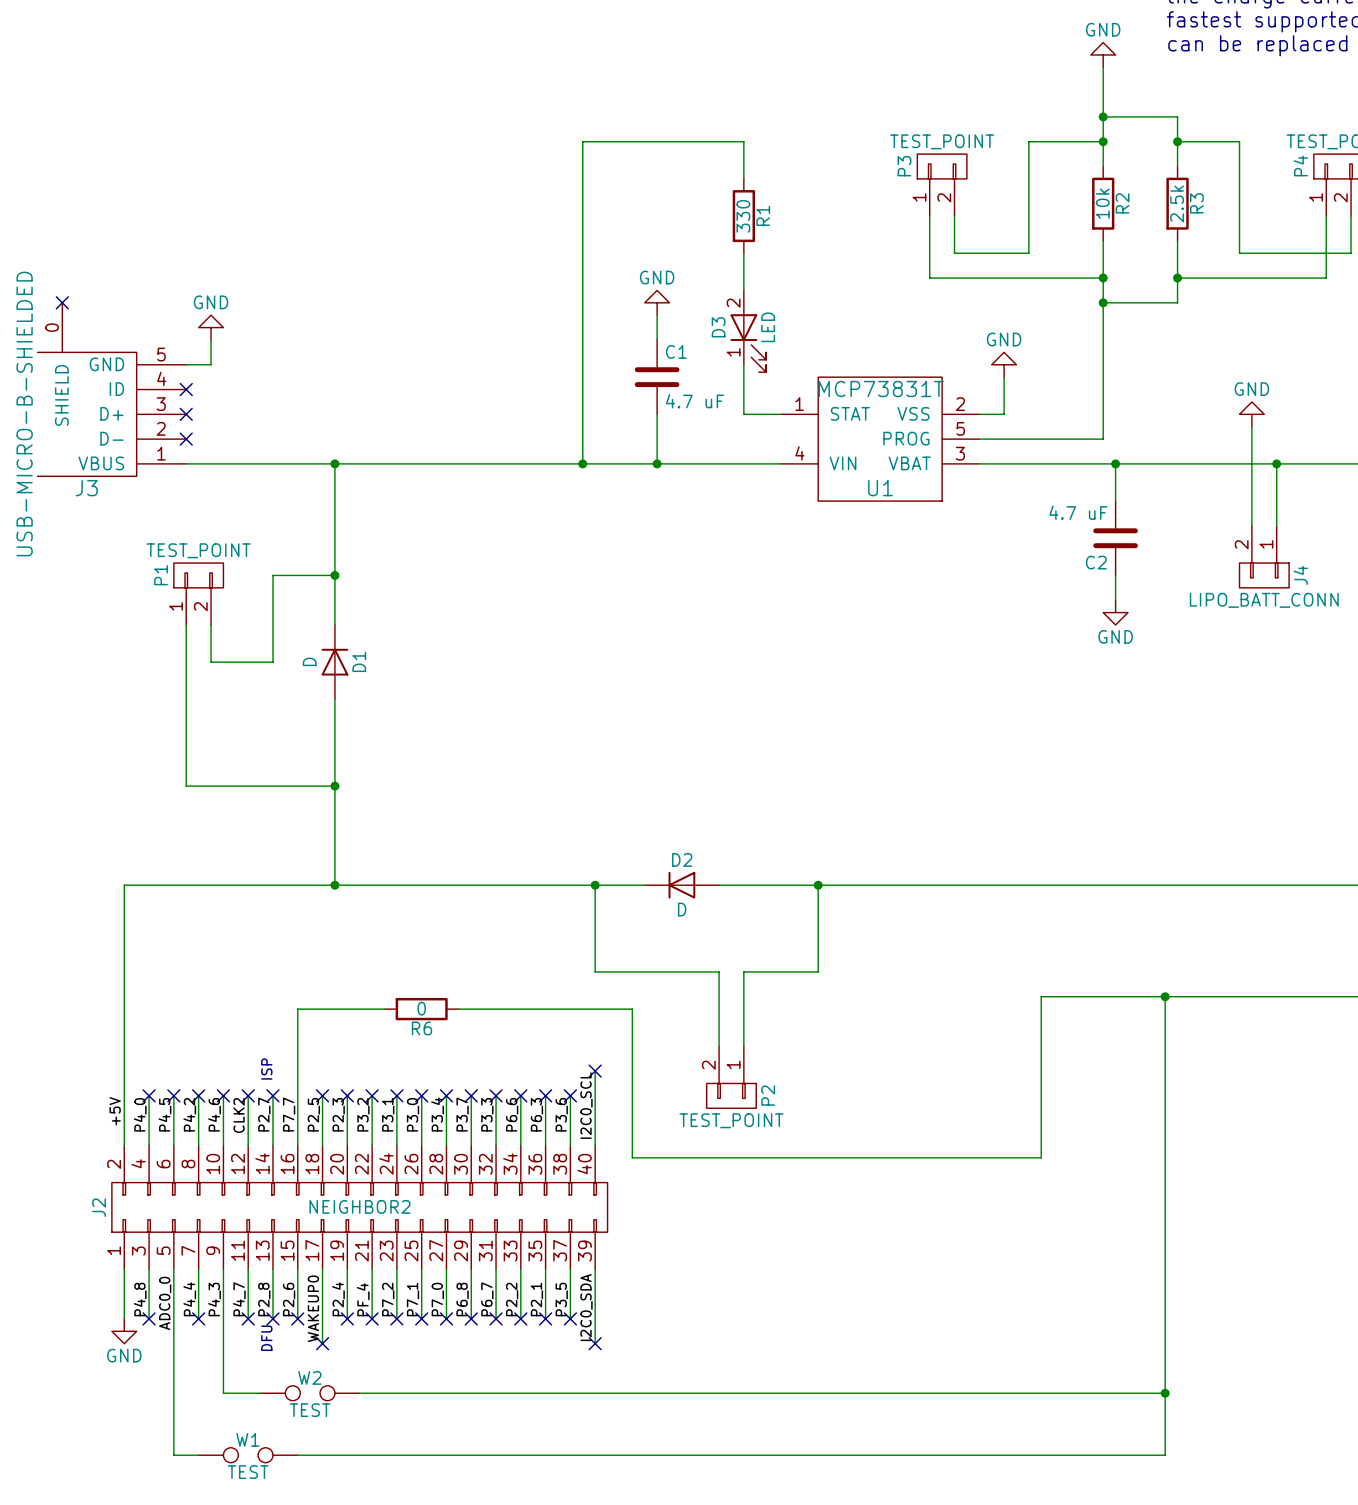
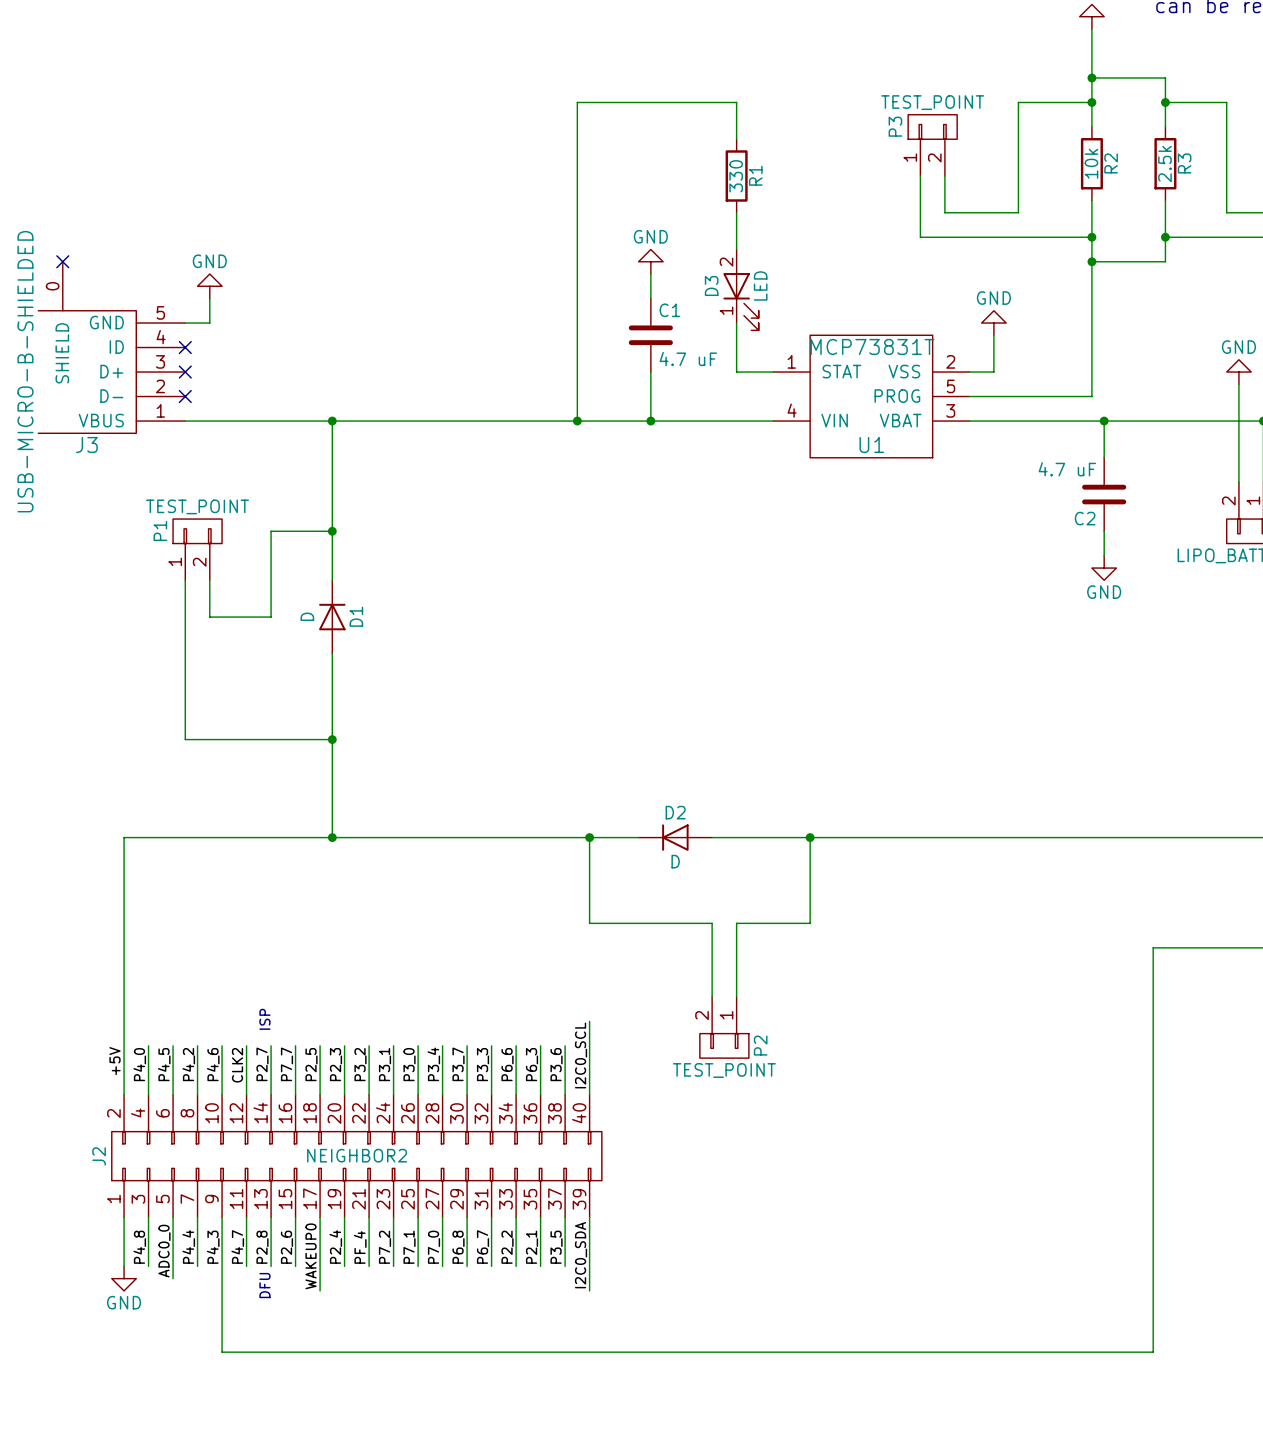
wire: (1165, 996) (1041, 996) (1041, 1157) (632, 1157) (632, 1009) (458, 1009) -> none
junction: (1165, 996) -> none
wire: (384, 1009) (297, 1009) (297, 1095) -> none
R6: 0 (421, 1009) -> none
no-connect mark: (595, 1071) -> none
no-connect mark: (149, 1095) -> none
no-connect mark: (173, 1095) -> none
no-connect mark: (198, 1095) -> none
no-connect mark: (223, 1095) -> none
no-connect mark: (248, 1095) -> none
no-connect mark: (272, 1095) -> none
no-connect mark: (322, 1095) -> none
no-connect mark: (347, 1095) -> none
no-connect mark: (372, 1095) -> none
no-connect mark: (396, 1095) -> none
no-connect mark: (421, 1095) -> none
no-connect mark: (446, 1095) -> none
no-connect mark: (471, 1095) -> none
no-connect mark: (496, 1095) -> none
no-connect mark: (520, 1095) -> none
no-connect mark: (545, 1095) -> none
no-connect mark: (570, 1095) -> none
no-connect mark: (149, 1318) -> none
no-connect mark: (198, 1318) -> none
no-connect mark: (248, 1318) -> none
no-connect mark: (272, 1318) -> none
no-connect mark: (297, 1318) -> none
no-connect mark: (347, 1318) -> none
no-connect mark: (372, 1318) -> none
no-connect mark: (396, 1318) -> none
no-connect mark: (421, 1318) -> none
no-connect mark: (446, 1318) -> none
no-connect mark: (471, 1318) -> none
no-connect mark: (496, 1318) -> none
no-connect mark: (520, 1318) -> none
no-connect mark: (545, 1318) -> none
no-connect mark: (570, 1318) -> none
wire: (173, 1331) (173, 1455) (198, 1455) -> none
no-connect mark: (322, 1343) -> none
no-connect mark: (595, 1343) -> none
wire: (223, 1393) (260, 1393) -> none
W2: TEST (310, 1393) -> none
wire: (359, 1393) (1165, 1393) -> none
junction: (1165, 1393) -> none
wire: (1165, 1405) (1165, 1455) (297, 1455) -> (1153, 1352) (222, 1352) (222, 1339)
W1: TEST (248, 1455) -> none

